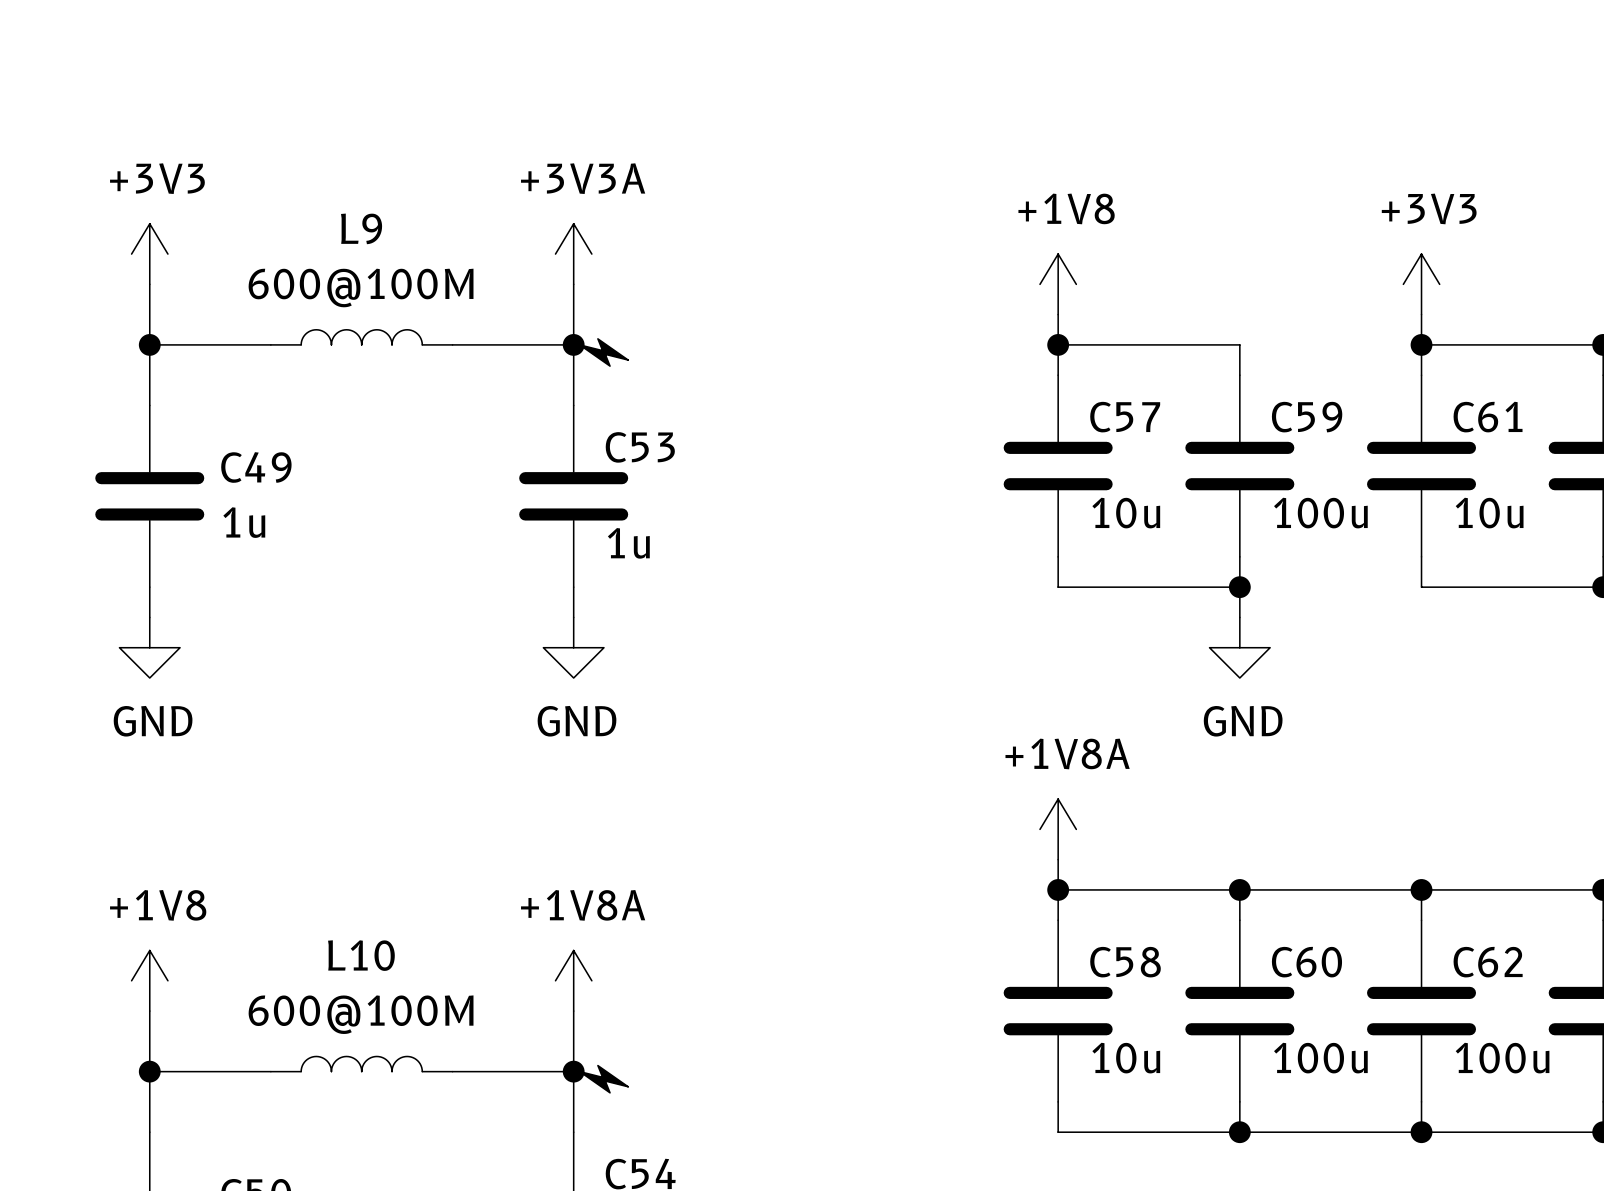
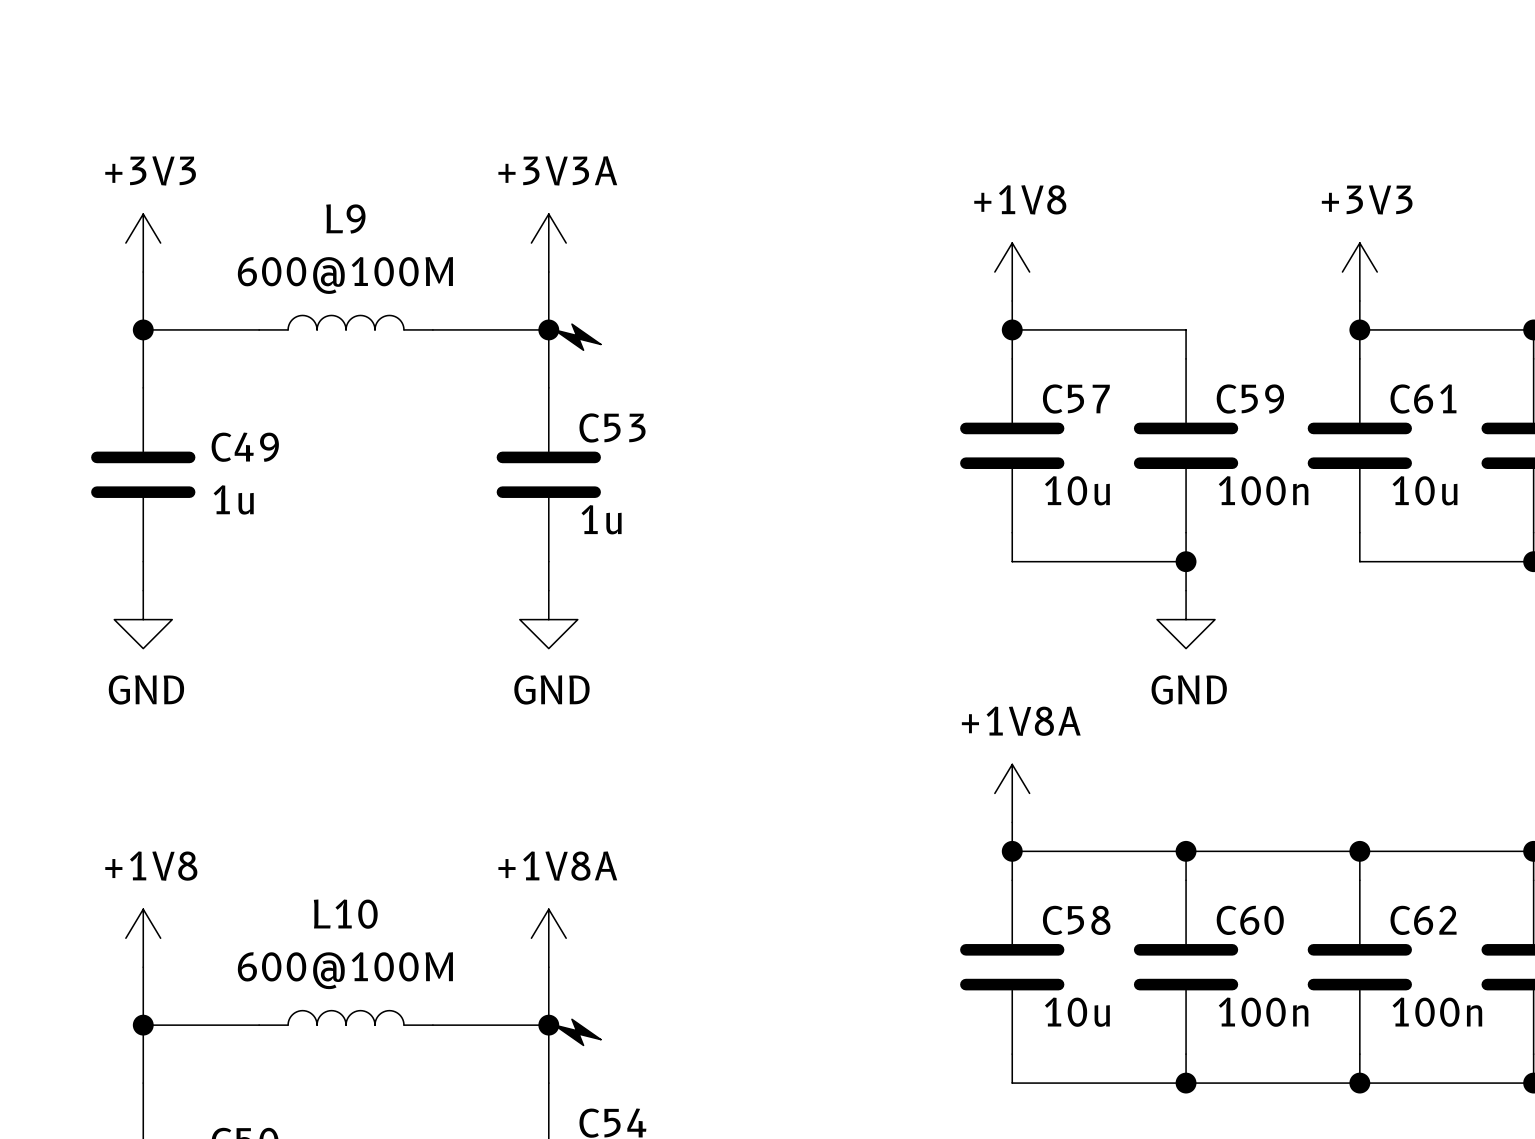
C59 value: 100u (1320, 513) -> 100n (1263, 490)
C60 value: 100u (1320, 1058) -> 100n (1263, 1012)
C62 value: 100u (1502, 1058) -> 100n (1437, 1012)

